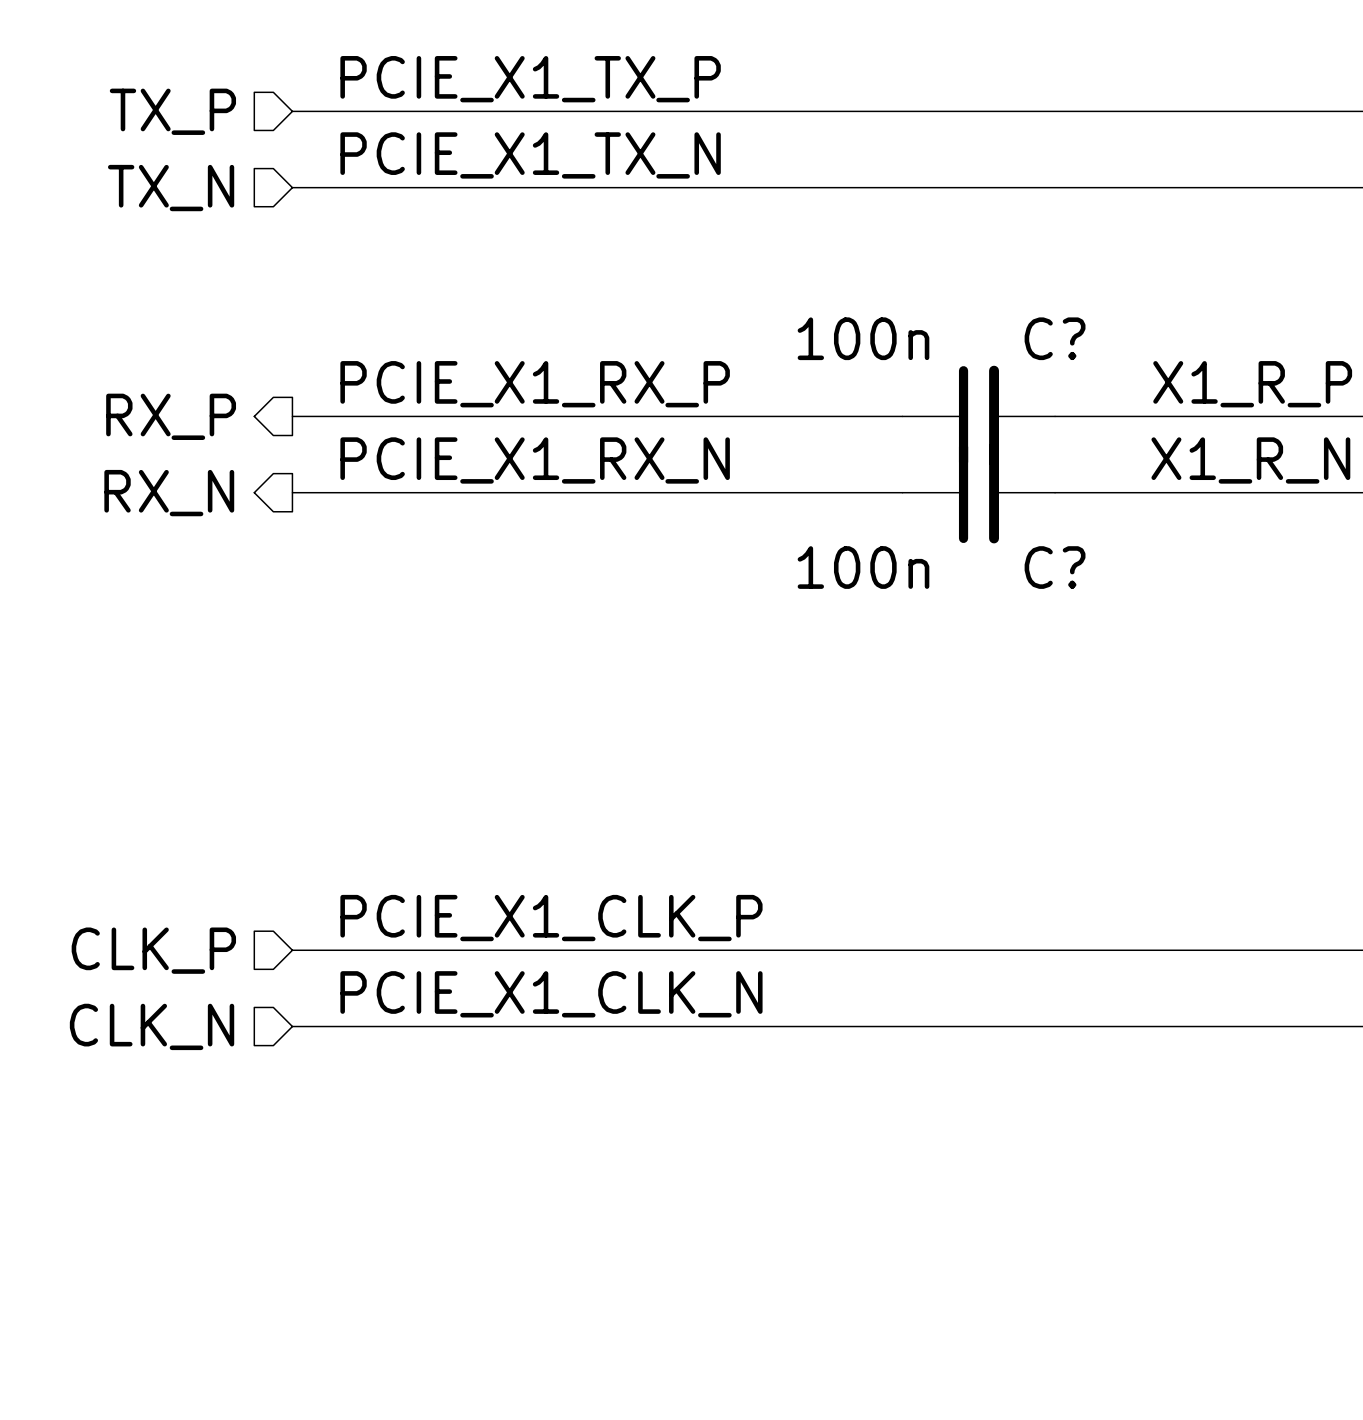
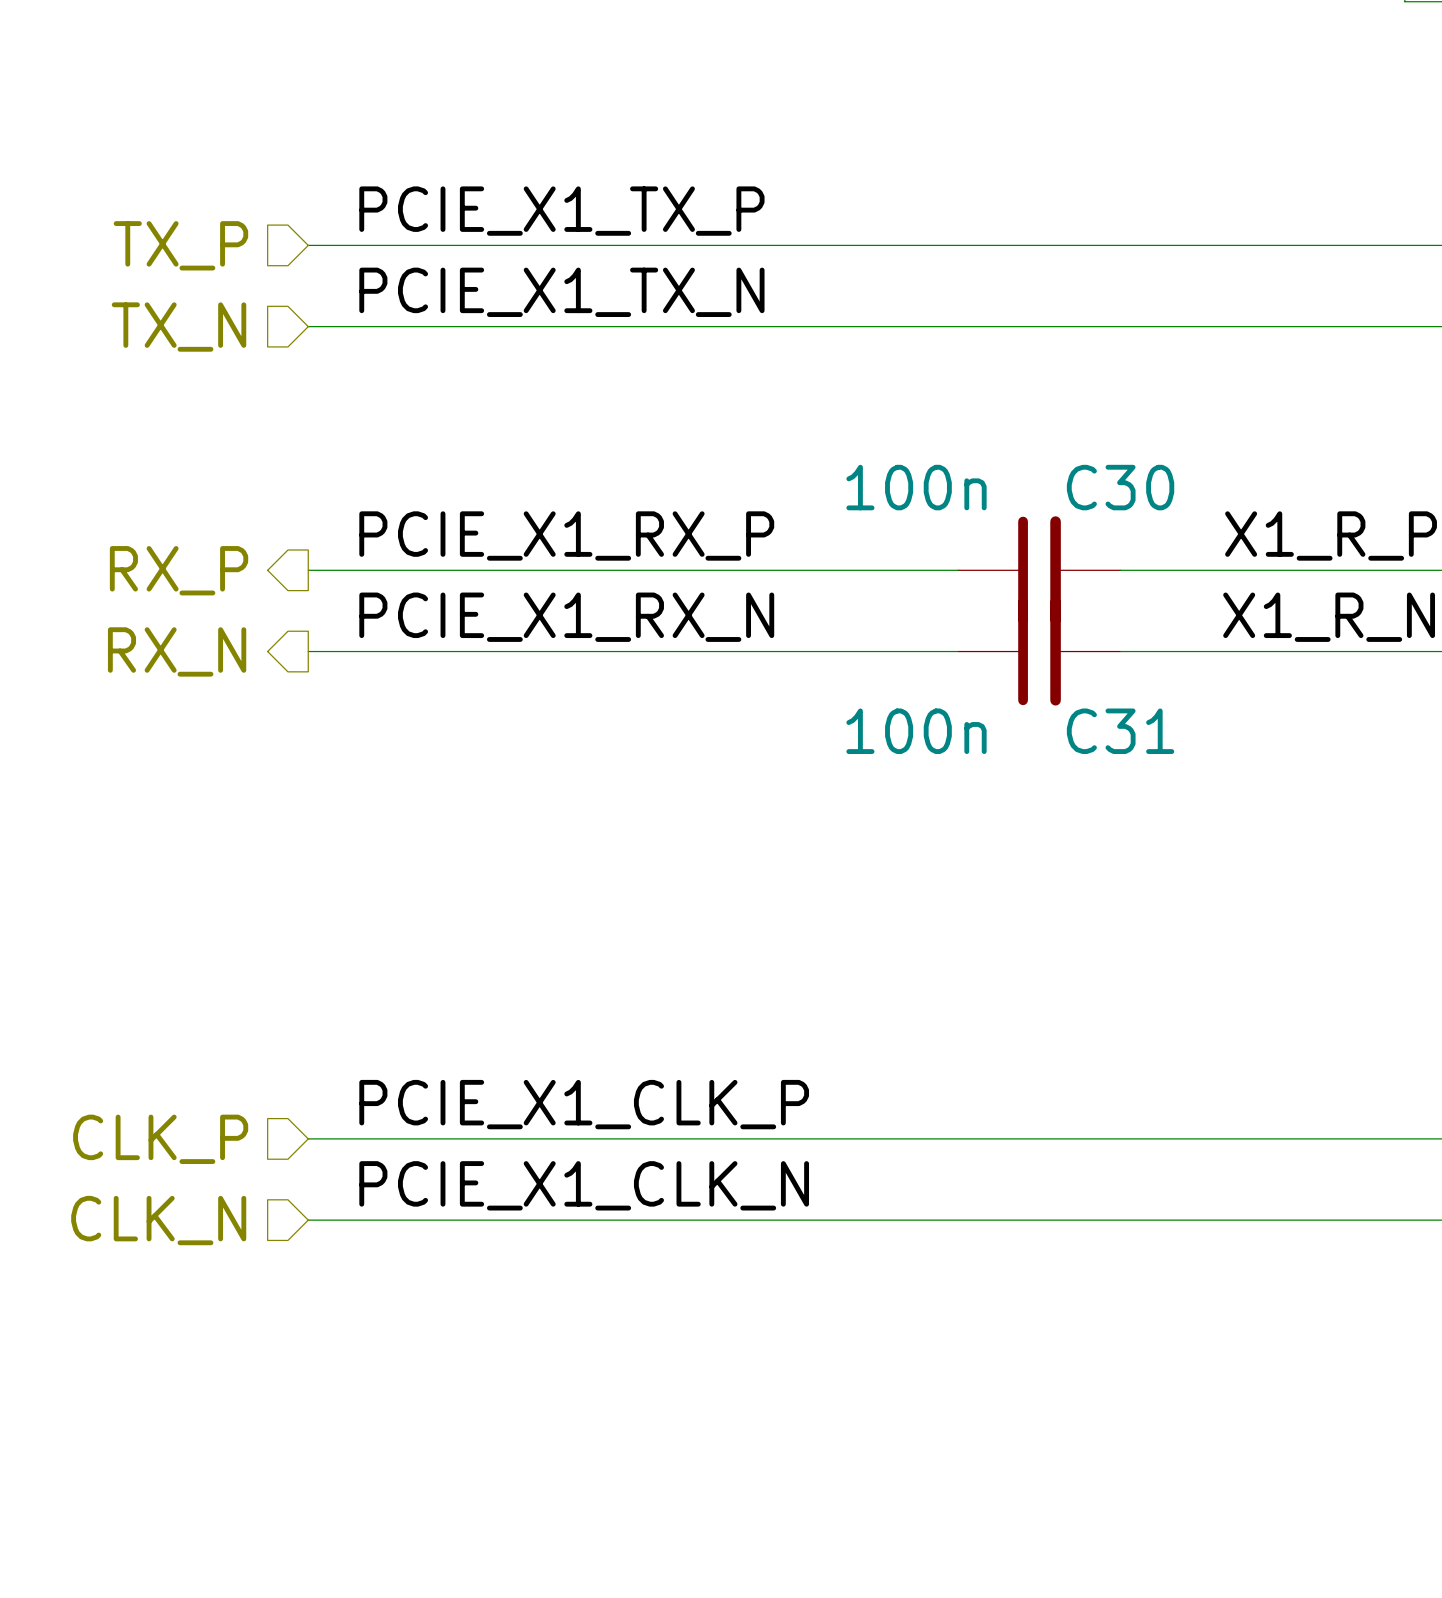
C? name: C? (1055, 338) -> C30 (1120, 487)
C? name: C? (1055, 567) -> C31 (1120, 731)

